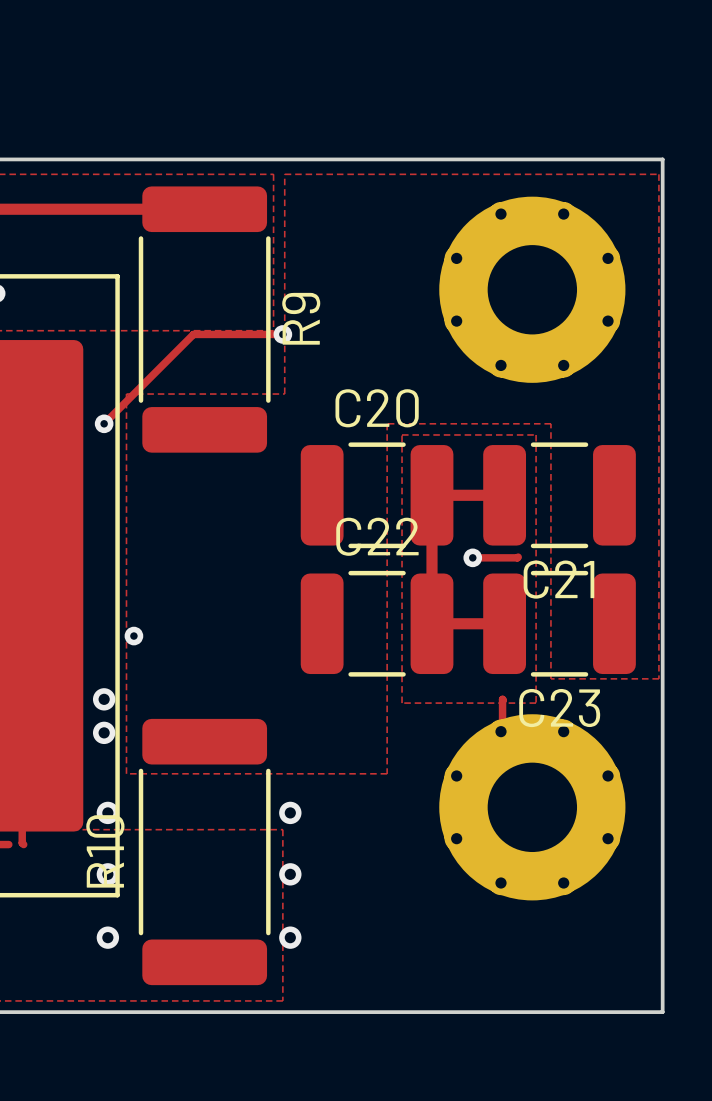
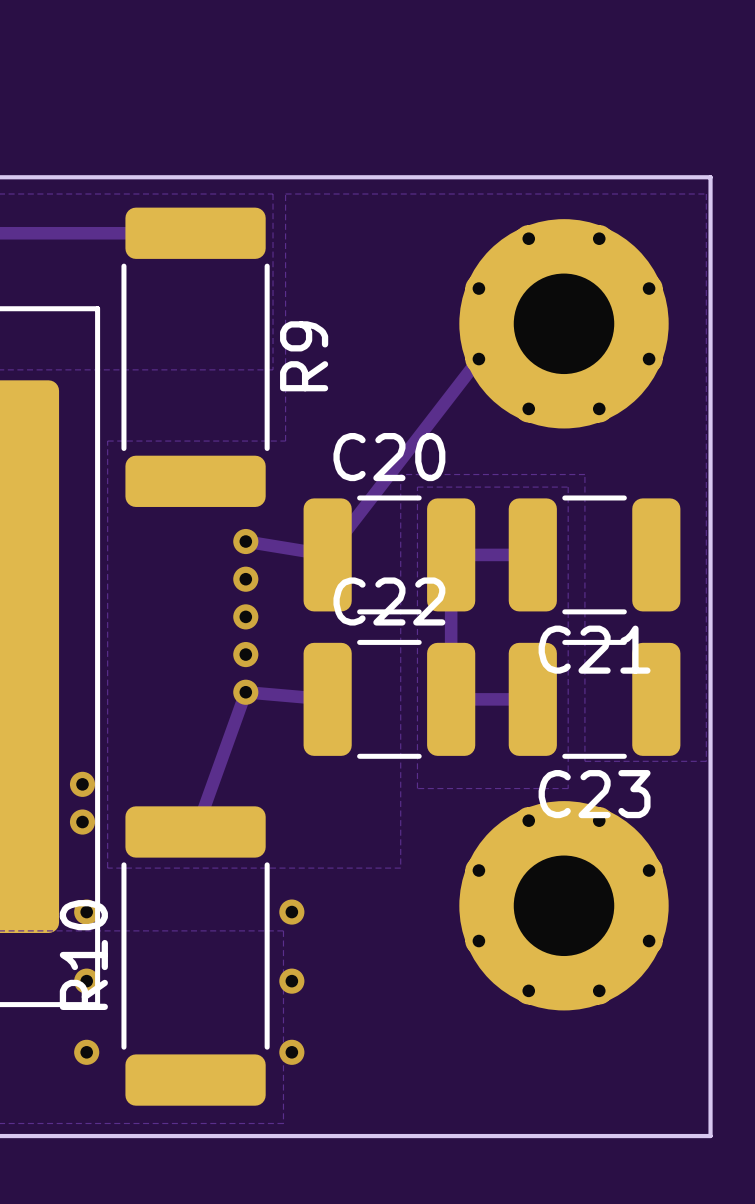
track: none -> (478, 359) (327, 554) (245, 541)
track: (282, 334) (193, 334) (104, 423) -> none
via: (282, 334) -> none
via: (104, 423) -> none
via: none -> (245, 541)
via: none -> (245, 579)
via: none -> (245, 616)
via: (472, 557) -> none
track: (518, 557) (472, 557) -> none
via: none -> (245, 654)
via: none -> (245, 692)
track: none -> (327, 699) (245, 692) (195, 831)
via: (133, 636) -> none
track: (503, 700) (502, 732) (501, 731) -> none

